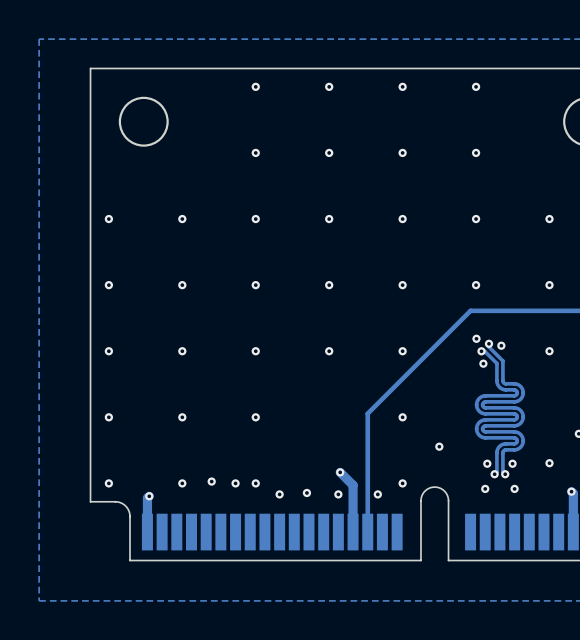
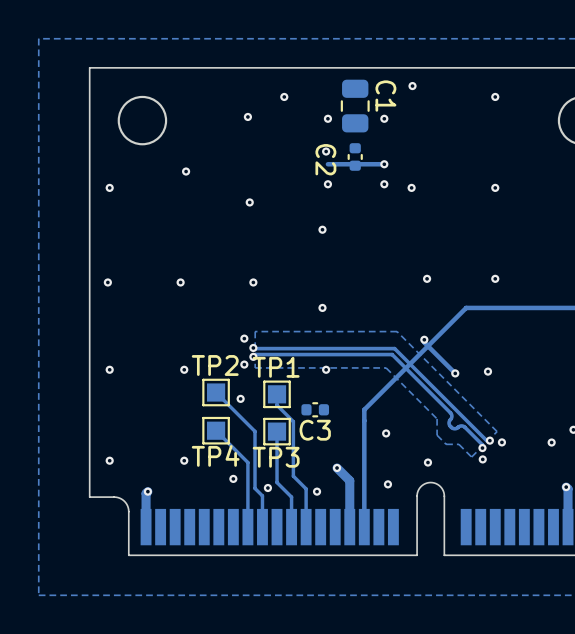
via: (255, 86) -> none
via: (329, 86) -> none
via position: (402, 86) -> (412, 86)
via position: (476, 86) -> (495, 96)
via: none -> (284, 96)
C1: none -> (355, 106)
via: none -> (247, 116)
via: none -> (327, 118)
via: none -> (384, 118)
via: (255, 152) -> none
via: (402, 152) -> none
via: (476, 152) -> none
C2: none -> (355, 156)
track: none -> (384, 164) (327, 164)
via: none -> (384, 164)
via: none -> (186, 171)
via: none -> (327, 184)
via: none -> (384, 184)
via: none -> (411, 187)
via: none -> (495, 187)
via position: (108, 219) -> (109, 187)
via: (182, 219) -> none
via position: (255, 219) -> (249, 202)
via position: (329, 219) -> (322, 229)
via: (402, 219) -> none
via: (476, 219) -> none
via: (549, 219) -> none
via: none -> (427, 278)
via: none -> (495, 278)
via: (329, 285) -> none
via: (402, 285) -> none
via: (476, 285) -> none
via: (549, 285) -> none
via: none -> (322, 307)
zone outline: none -> (397, 331) (497, 431) (471, 457) (458, 444) (446, 444) (437, 435) (437, 418) (386, 367) (255, 367) (255, 331) (397, 331)
via: (476, 338) -> none
via: none -> (244, 338)
track: none -> (424, 339) (424, 342) (455, 373)
via: none -> (424, 339)
track: (488, 343) (488, 347) (502, 360) (503, 382) (518, 384) (523, 391) (521, 397) (517, 401) (485, 401) (482, 404) (485, 407) (516, 408) (522, 413) (522, 420) (517, 425) (485, 425) (482, 427) (485, 431) (516, 432) (522, 436) (522, 442) (519, 447) (503, 451) (502, 471) (505, 474) -> none
via: (488, 343) -> none
via: (501, 345) -> none
track: none -> (253, 346) (255, 348) (394, 348) (486, 440) (489, 440)
via: (108, 351) -> none
via: (182, 351) -> none
via: (329, 351) -> none
via: (402, 351) -> none
track: (481, 351) (484, 351) (496, 363) (496, 381) (498, 386) (503, 389) (515, 390) (517, 392) (514, 395) (483, 396) (476, 402) (478, 409) (482, 413) (514, 413) (517, 416) (514, 419) (483, 420) (477, 425) (477, 432) (482, 437) (514, 437) (517, 439) (515, 443) (503, 444) (498, 448) (496, 471) (494, 474) -> none
via: (481, 351) -> none
via: (549, 351) -> none
track: none -> (253, 356) (255, 354) (392, 354) (450, 413) (450, 426) (454, 428) (460, 425) (464, 426) (482, 444) (482, 448)
via: none -> (253, 356)
via: (483, 363) -> none
via: none -> (244, 364)
via: none -> (109, 369)
via: none -> (184, 369)
via: none -> (326, 369)
via: none -> (488, 371)
via: none -> (455, 373)
track: none -> (216, 392) (255, 431) (255, 488) (262, 495) (262, 527)
TP2: none -> (216, 392)
track: none -> (277, 394) (277, 405) (293, 421) (293, 476) (306, 488) (306, 527)
TP1: none -> (277, 394)
C3: none -> (315, 409)
via: (108, 417) -> none
via: (182, 417) -> none
via position: (255, 417) -> (240, 398)
via: (402, 417) -> none
track: none -> (216, 430) (247, 462) (247, 527)
TP4: none -> (216, 430)
track: none -> (277, 431) (277, 482) (291, 497) (291, 527)
TP3: none -> (277, 431)
via: none -> (386, 433)
via: none -> (489, 440)
via: (439, 446) -> none
via: none -> (501, 442)
via: none -> (482, 448)
via: (512, 463) -> none
via position: (549, 463) -> (551, 442)
via: none -> (184, 460)
via: none -> (427, 462)
via: (494, 474) -> none
via: (505, 474) -> none
via: (211, 481) -> none
via position: (108, 483) -> (109, 460)
via: (182, 483) -> none
via: (255, 483) -> none
via: (402, 483) -> none
via: none -> (387, 484)
via: (485, 488) -> none
via: (514, 488) -> none
via: none -> (267, 488)
via: (306, 492) -> none
via: (279, 494) -> none
via: (338, 494) -> none
via: (377, 494) -> none
via: none -> (317, 491)

